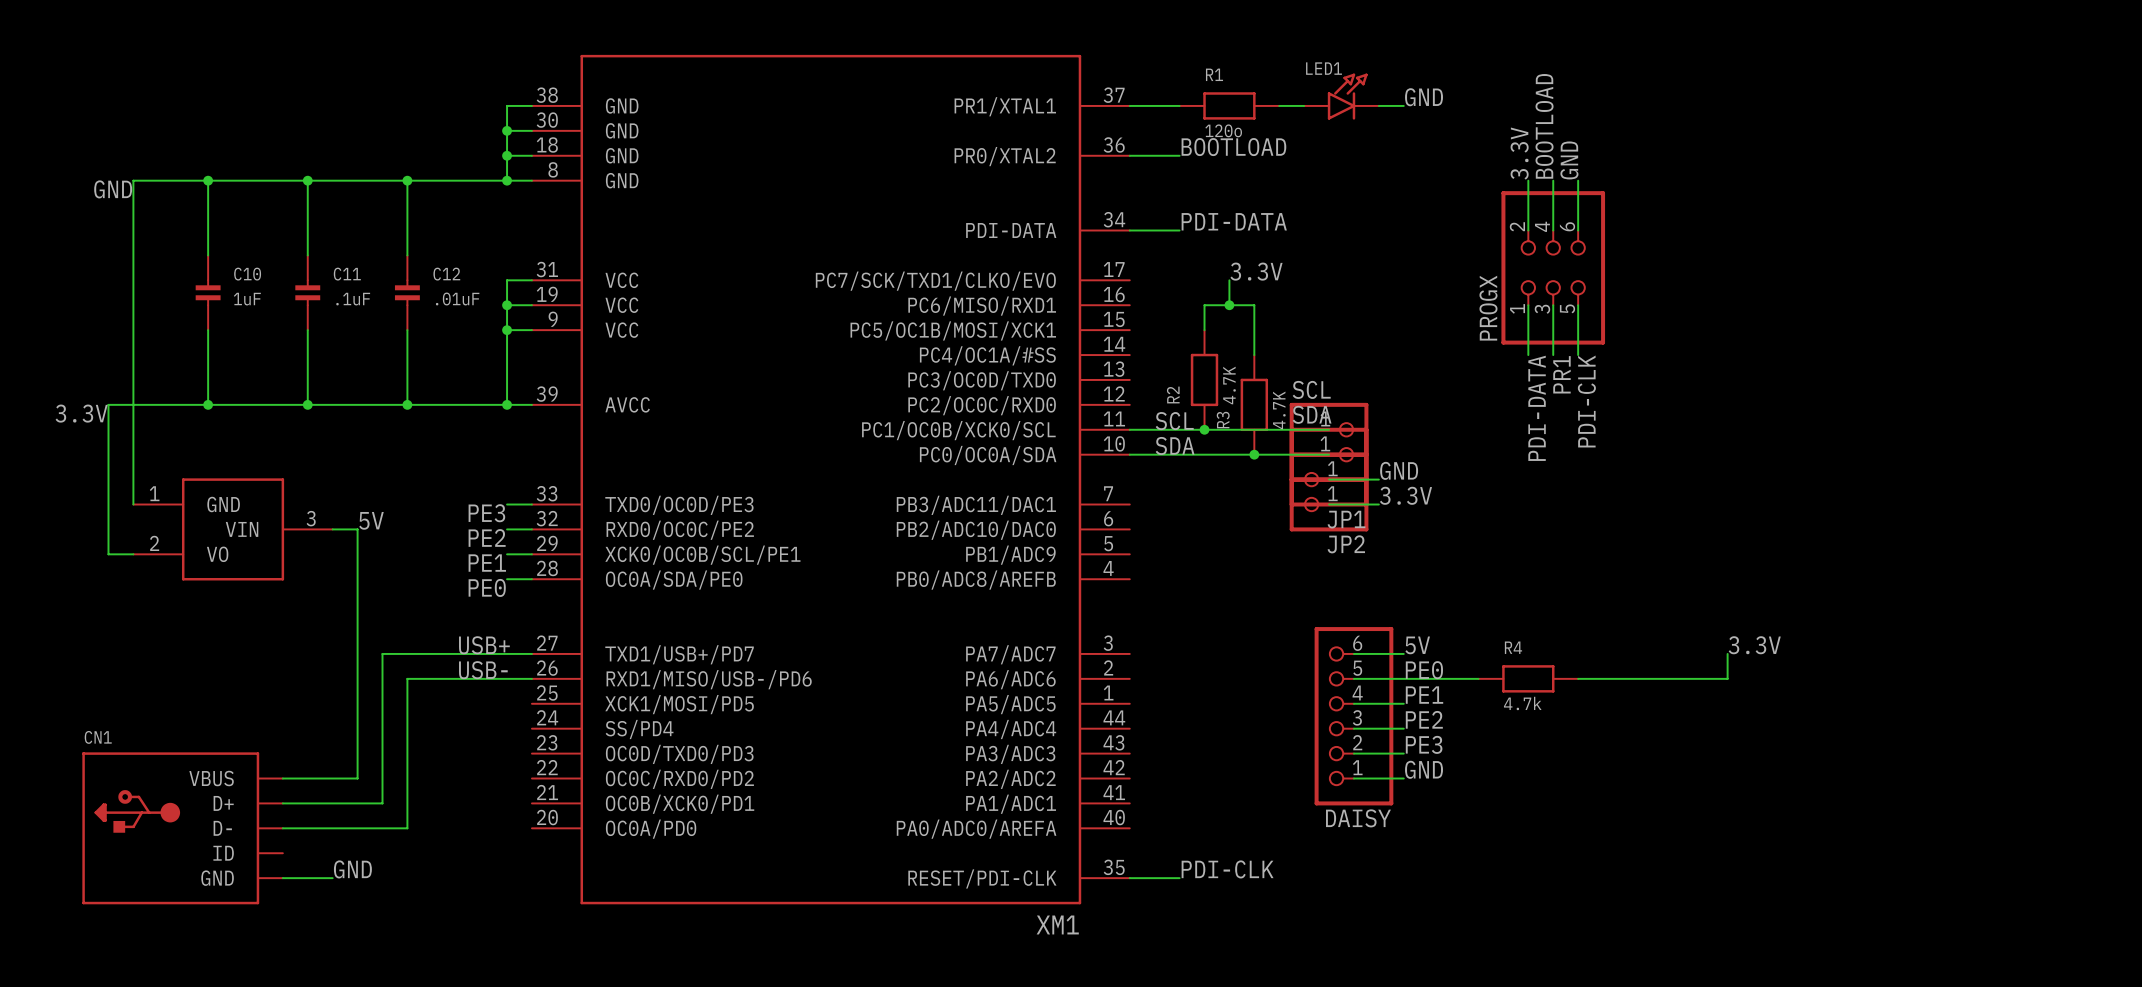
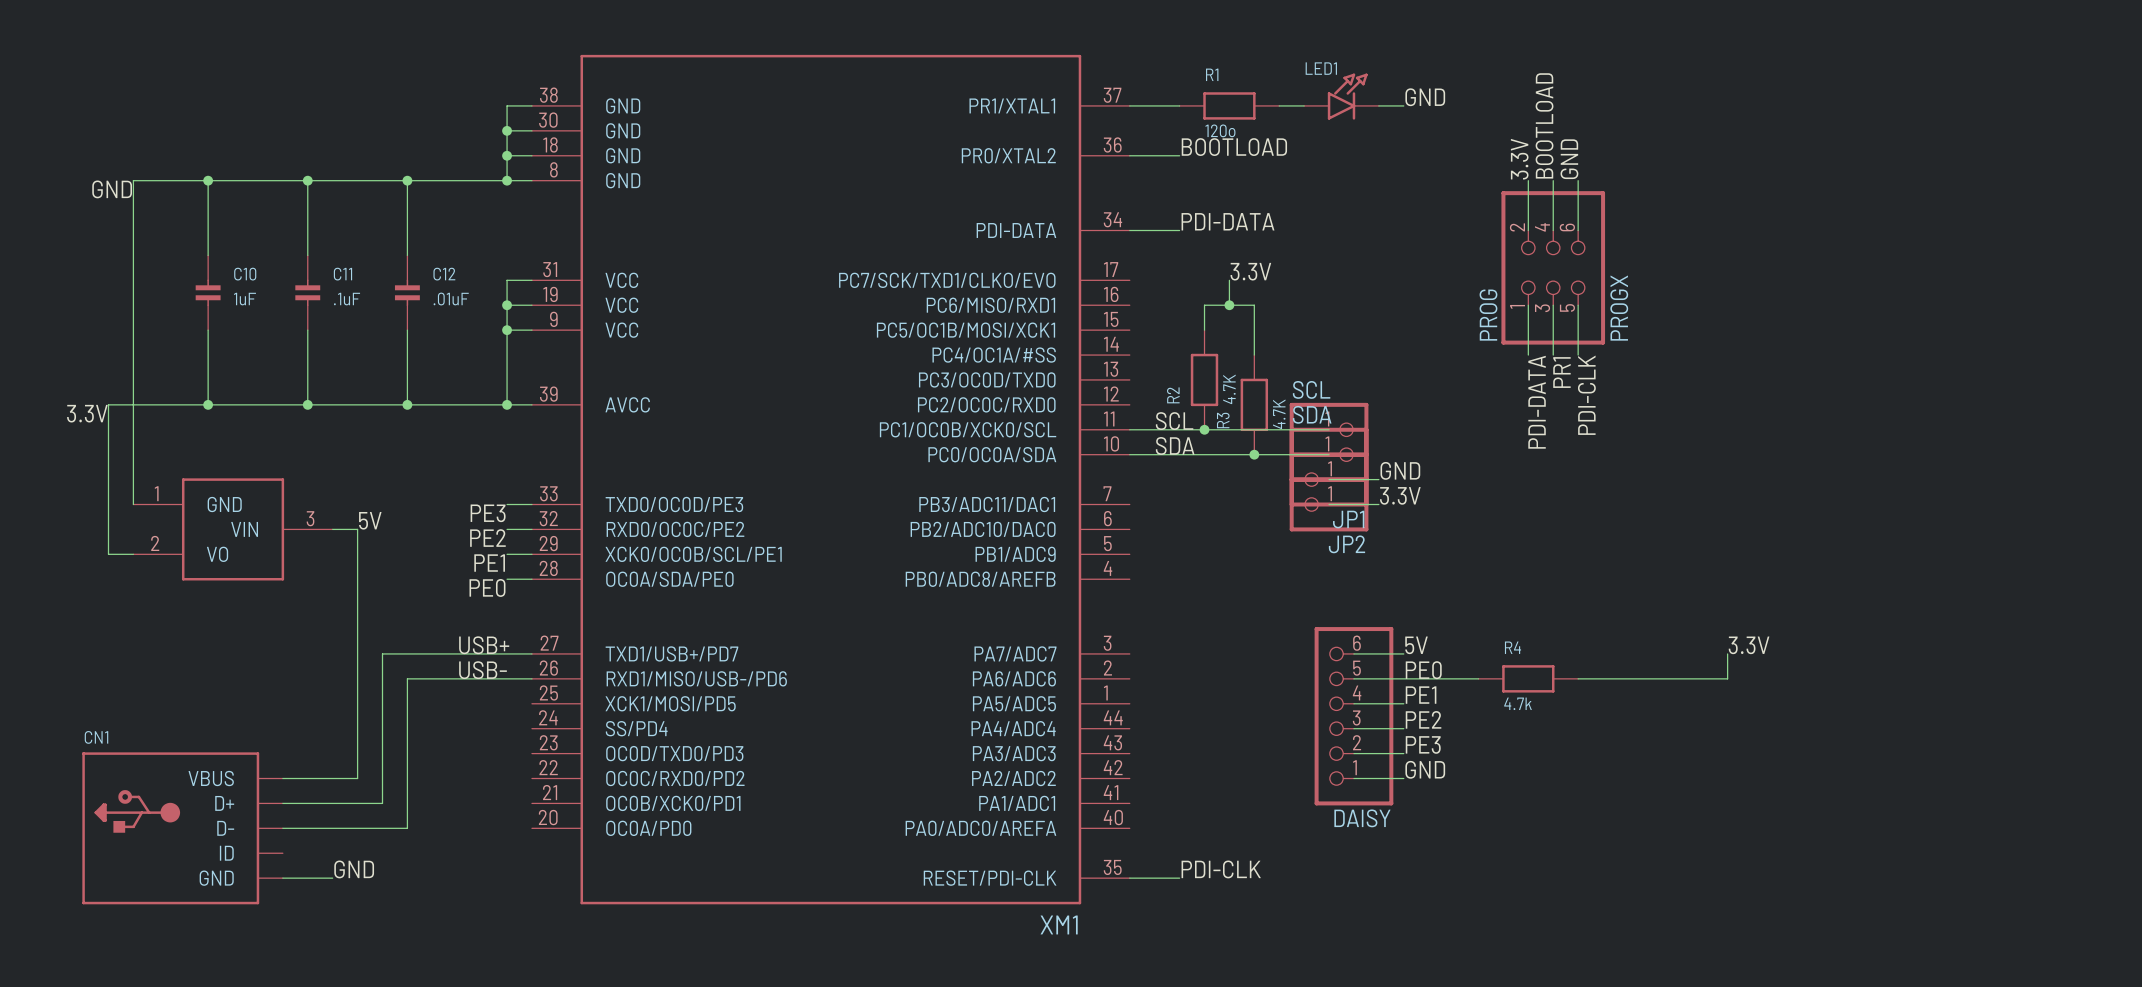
PROGX name: PROGX (1488, 308) -> PROG (1488, 315)
PROGX value: none -> PROGX (1619, 308)

